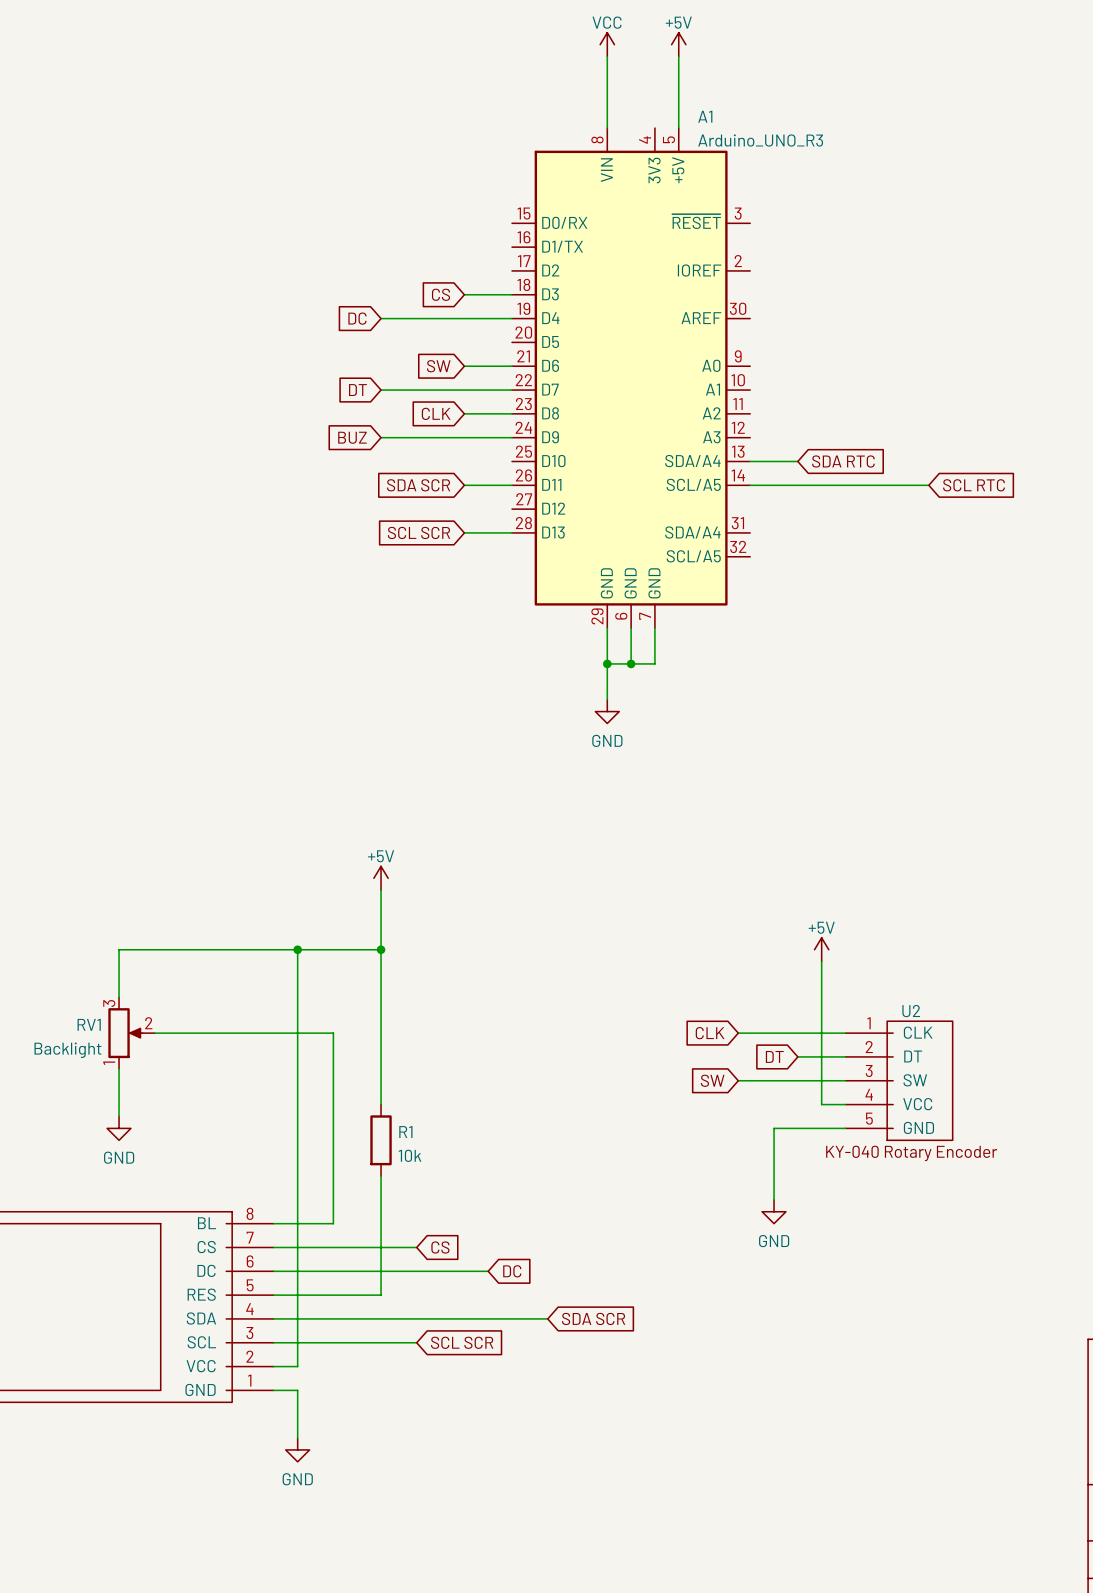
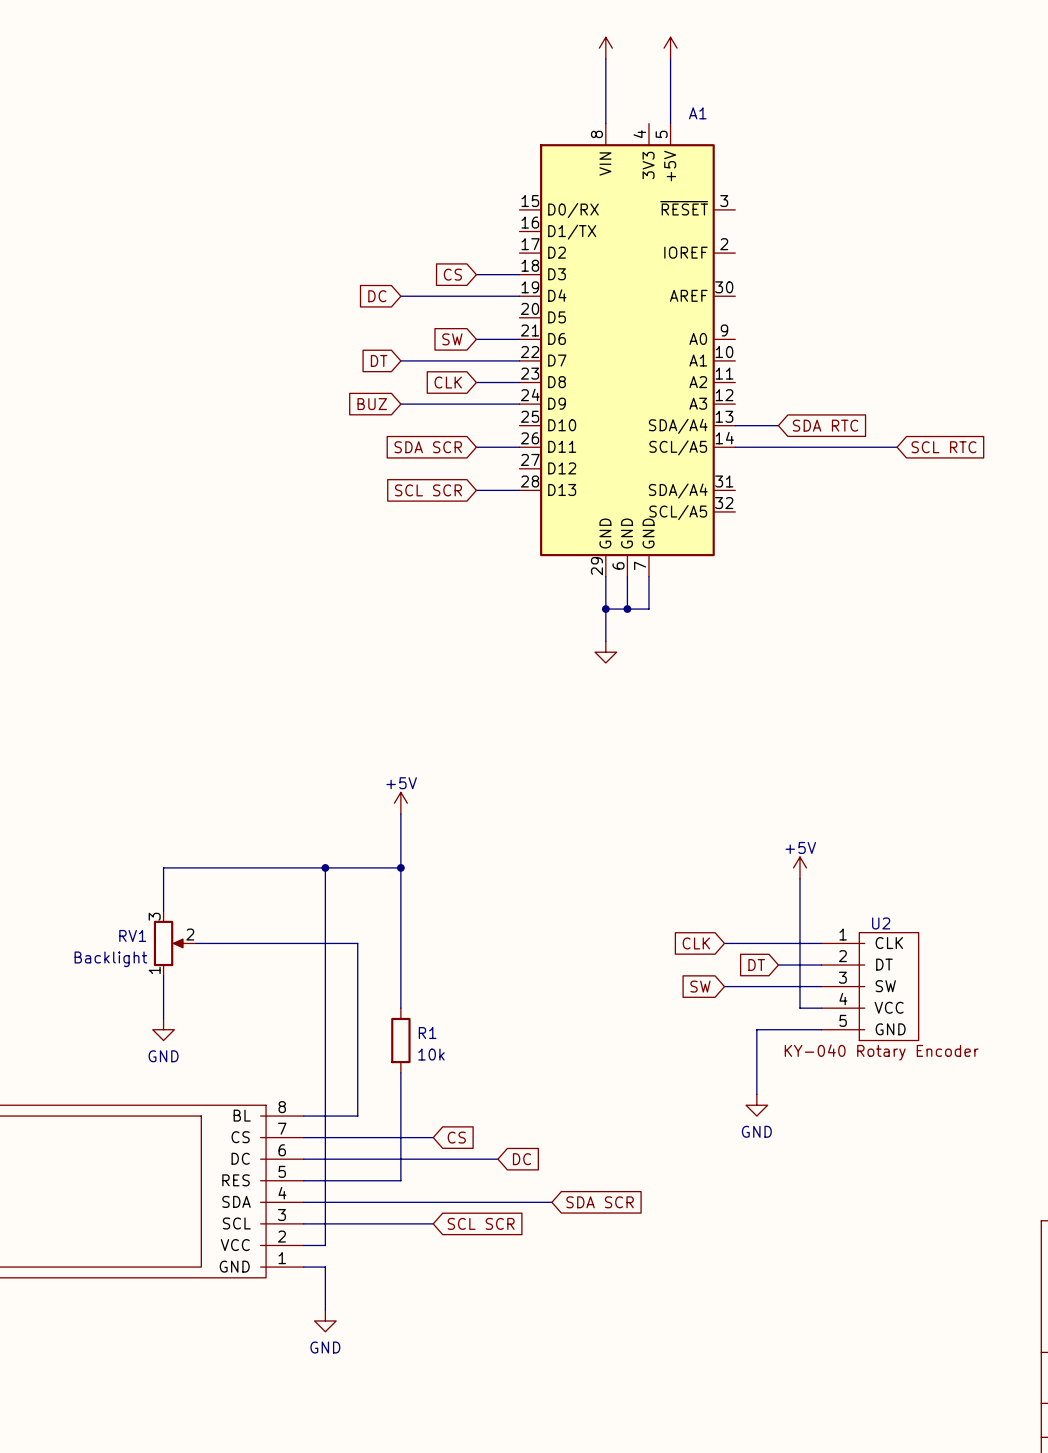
power symbol text: VCC (607, 22) -> none
power symbol text: +5V (678, 22) -> none
A1 value: Arduino_UNO_R3 (760, 140) -> none
power symbol text: GND (607, 740) -> none

